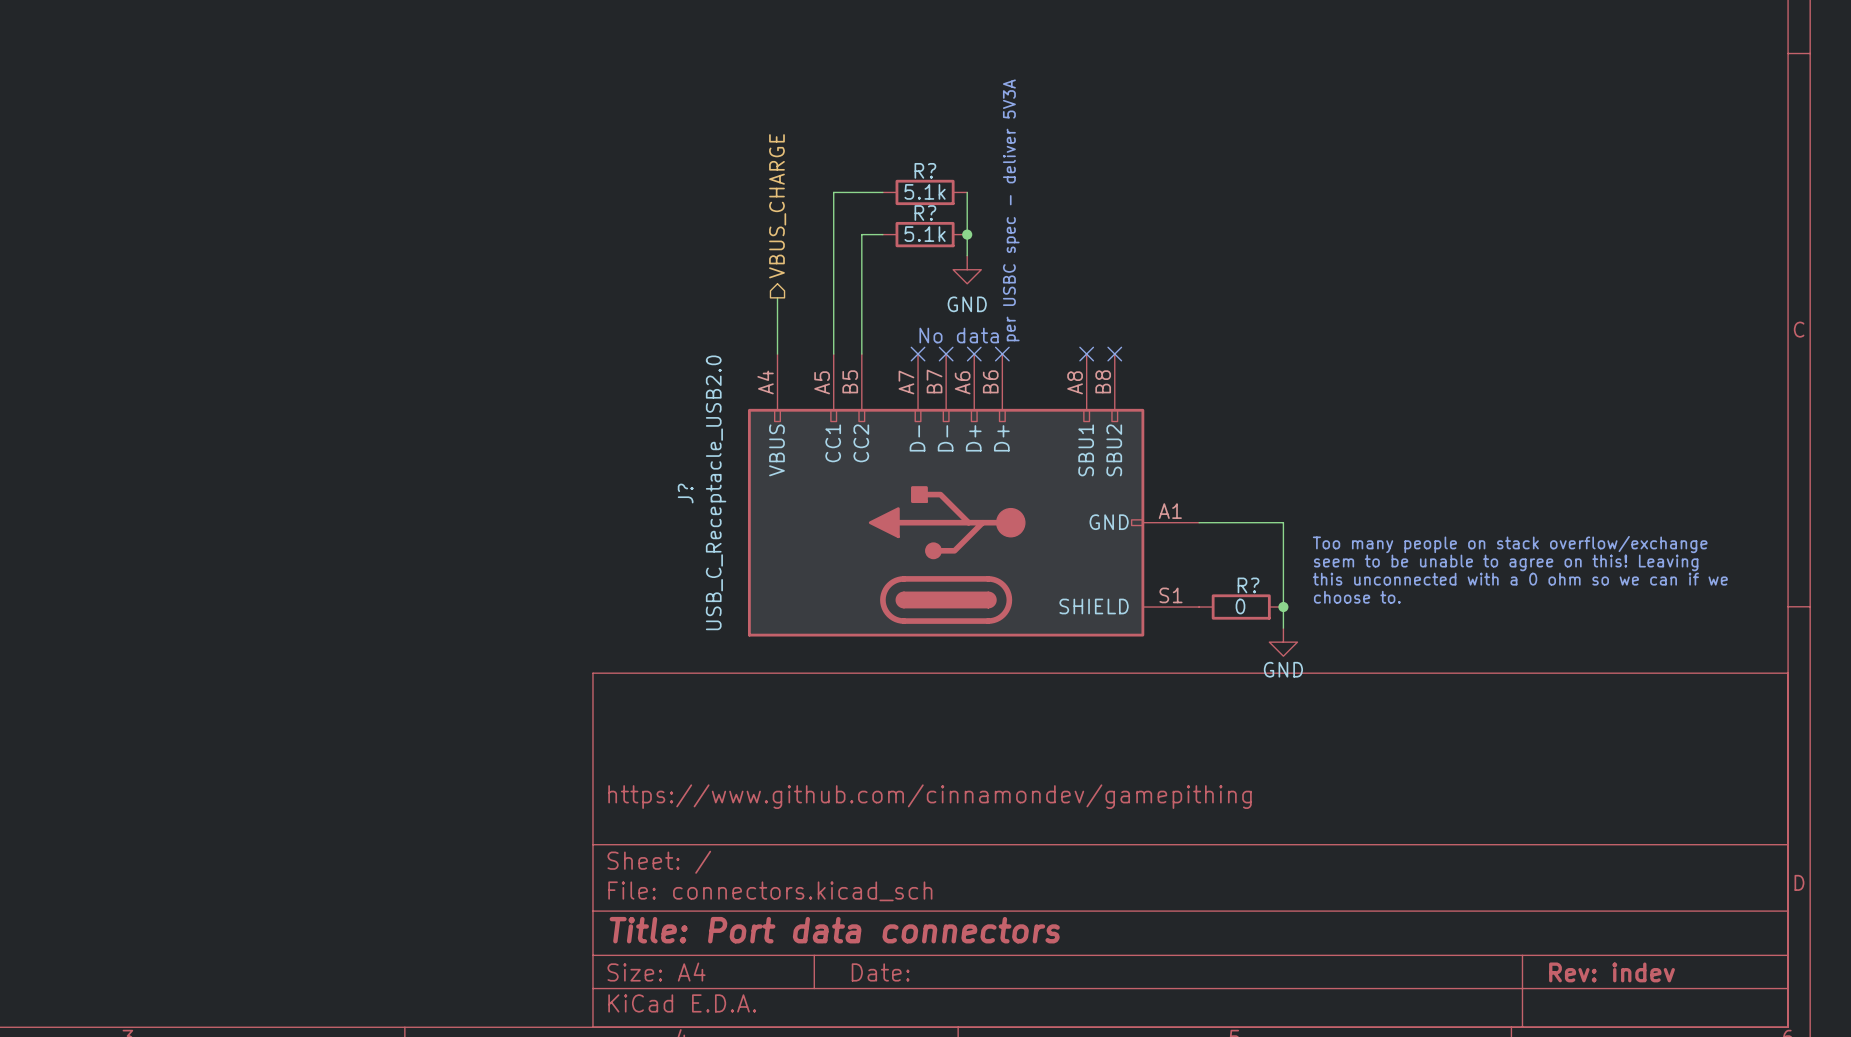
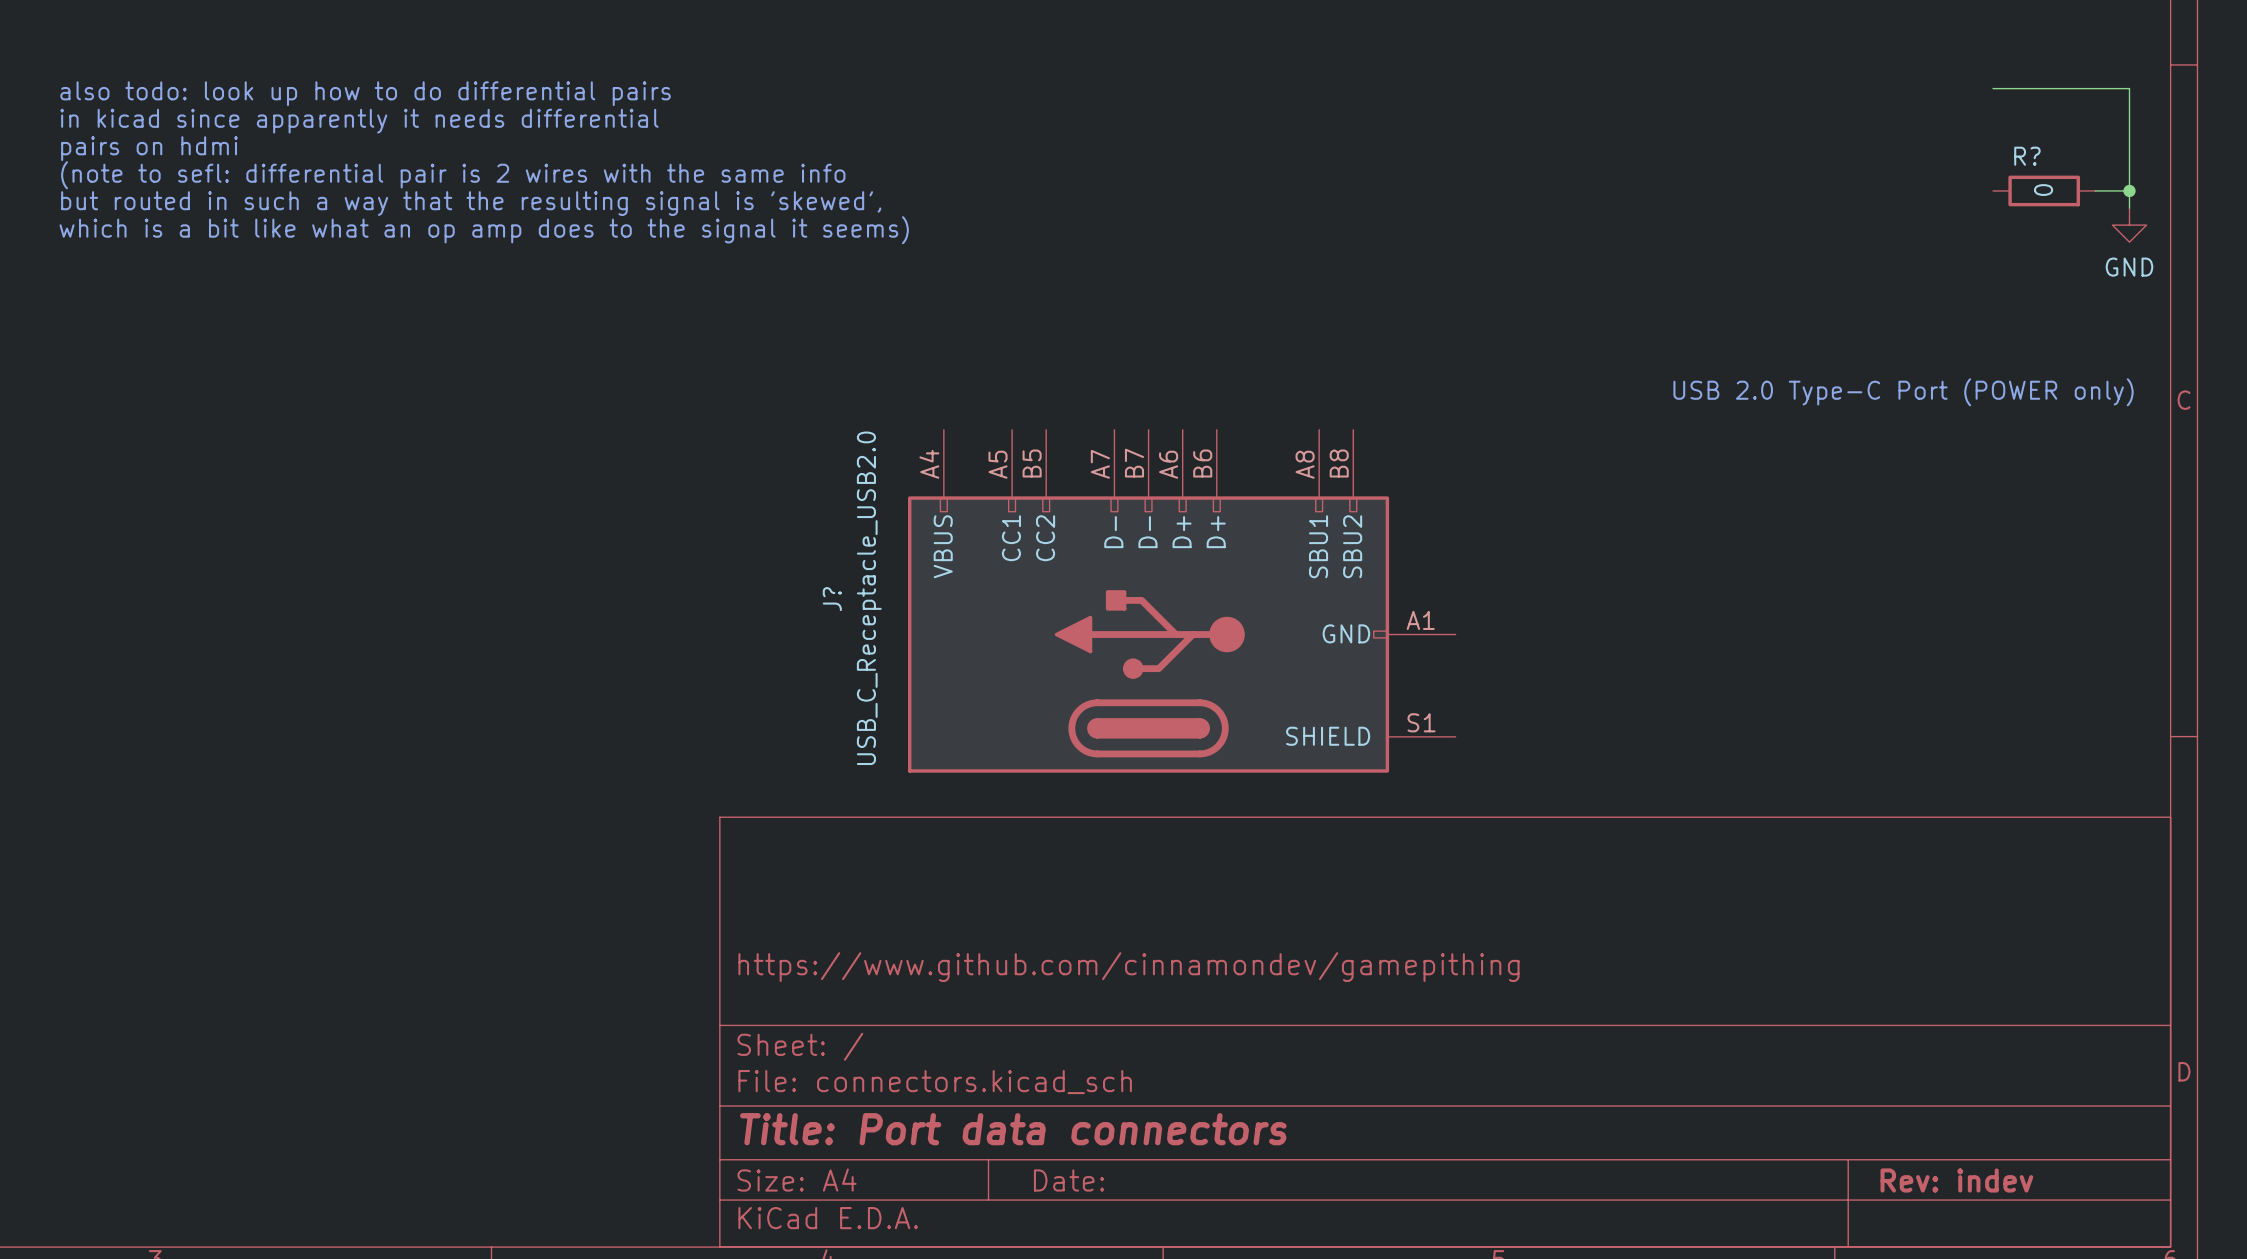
wire: none -> (1993, 88) (2129, 88) (2129, 208)
text: none -> also todo: look up how to do differential pairs (365, 93)
text: none -> in kicad since apparently it needs differential (359, 121)
text: none -> pairs on hdmi (149, 148)
text: none -> (note to sefl: differential pair is 2 wires with the same info (453, 175)
R?: none -> 0 (2044, 190)
wire: none -> (2095, 190) (2129, 190)
junction: none -> (2129, 190)
text: none -> but routed in such a way that the resulting signal is 'skewed', (471, 203)
power symbol: none -> GND (2129, 225)
text: none -> which is a bit like what an op amp does to the signal it seems) (484, 230)
wire: (882, 192) (833, 192) (833, 354) -> none
R?: 5.1k (925, 192) -> none
wire: (967, 192) (967, 255) -> none
hierarchical label: VBUS_CHARGE (777, 206) -> none
text: per USBC spec - deliver 5V3A (1011, 210) -> none
wire: (882, 234) (861, 234) (861, 354) -> none
R?: 5.1k (925, 234) -> none
junction: (967, 234) -> none
power symbol: GND (967, 269) -> none
wire: (777, 297) (777, 354) -> none
text: none -> USB 2.0 Type-C Port (POWER only) (1903, 392)
text: No data (959, 335) -> none
no-connect mark: (918, 354) -> none
no-connect mark: (946, 354) -> none
no-connect mark: (974, 354) -> none
no-connect mark: (1002, 354) -> none
no-connect mark: (1086, 354) -> none
no-connect mark: (1114, 354) -> none
wire: (1199, 522) (1283, 522) (1283, 628) -> none
text: Too many people on stack overflow/exchange (1510, 544) -> none
text: seem to be unable to agree on this! Leaving (1506, 562) -> none
text: this unconnected with a 0 ohm so we can if we (1520, 579) -> none
text: choose to. (1357, 597) -> none
R?: 0 (1241, 607) -> none
junction: (1283, 607) -> none
power symbol: GND (1283, 642) -> none

